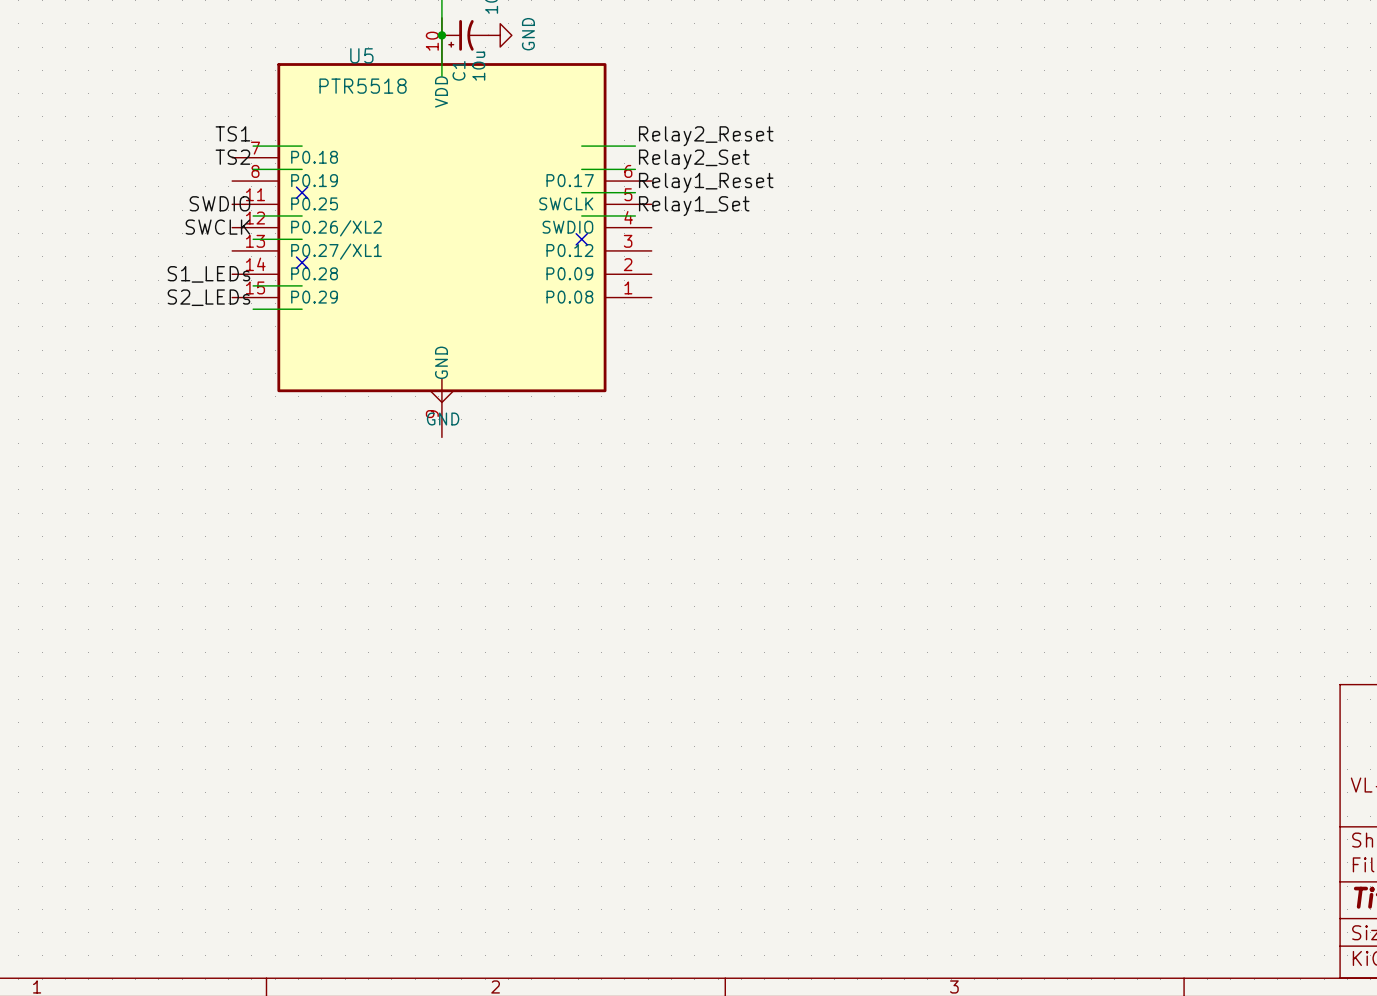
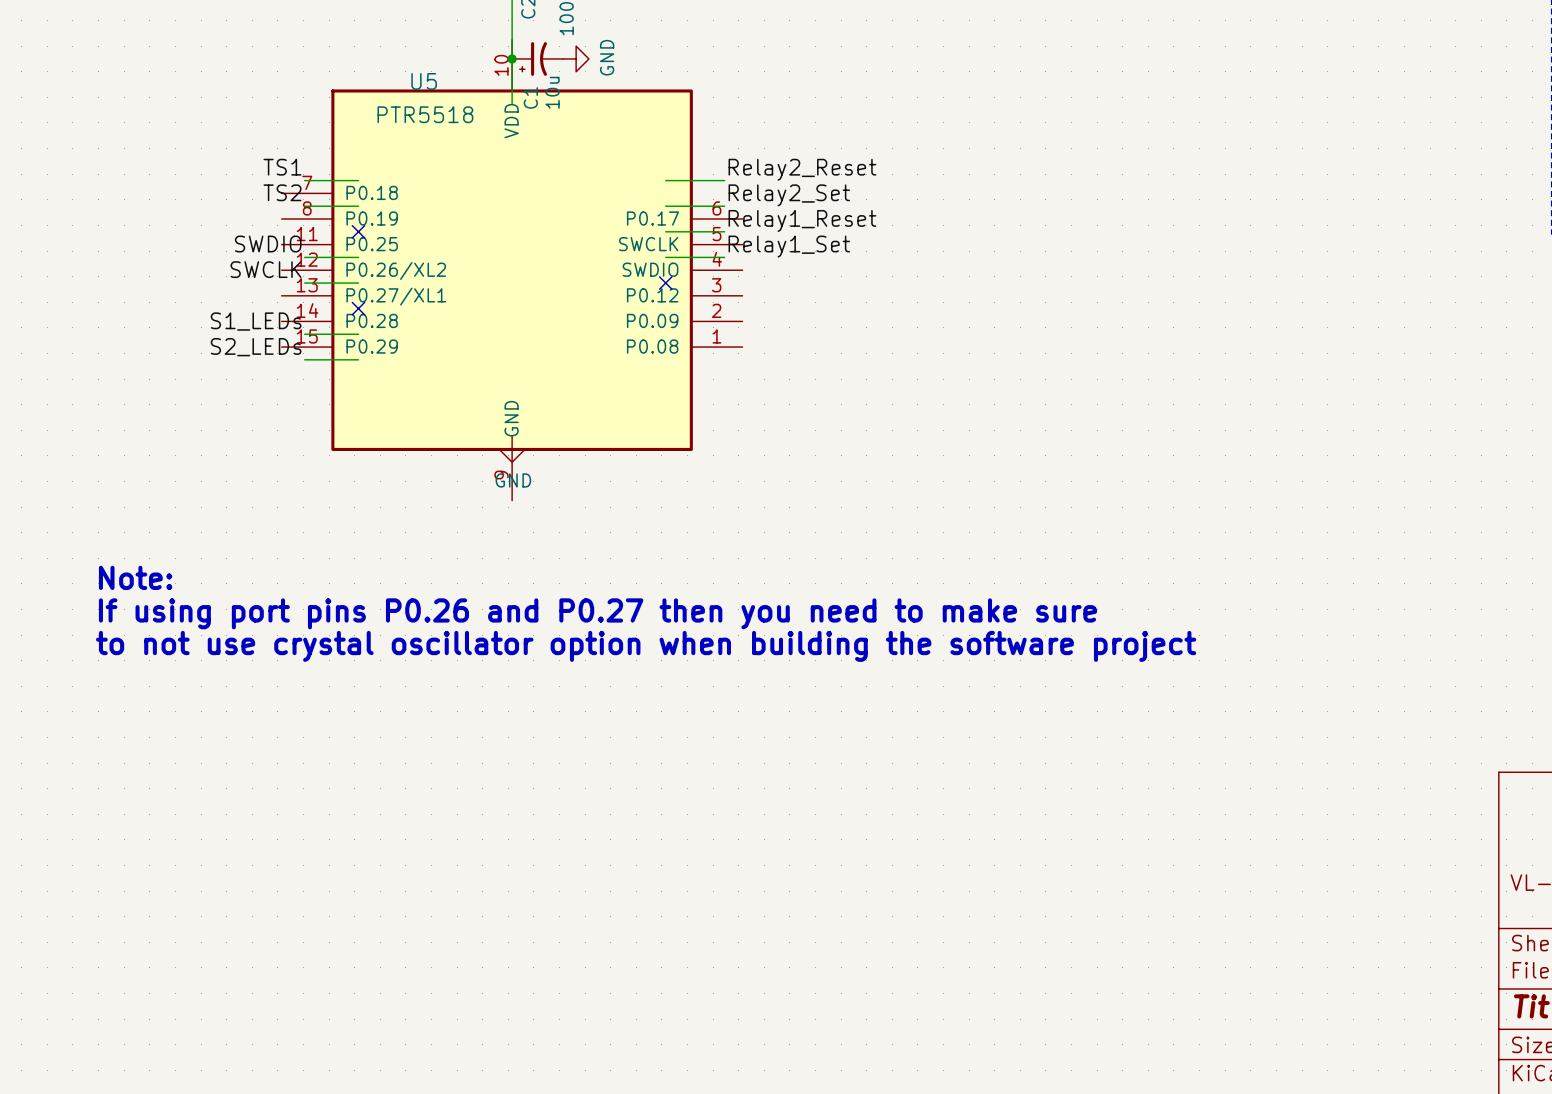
text: none -> Note: (135, 577)
text: none -> If using port pins P0.26 and P0.27 then you need to make sure (597, 613)
text: none -> to not use crystal oscillator option when building the software project (646, 646)

